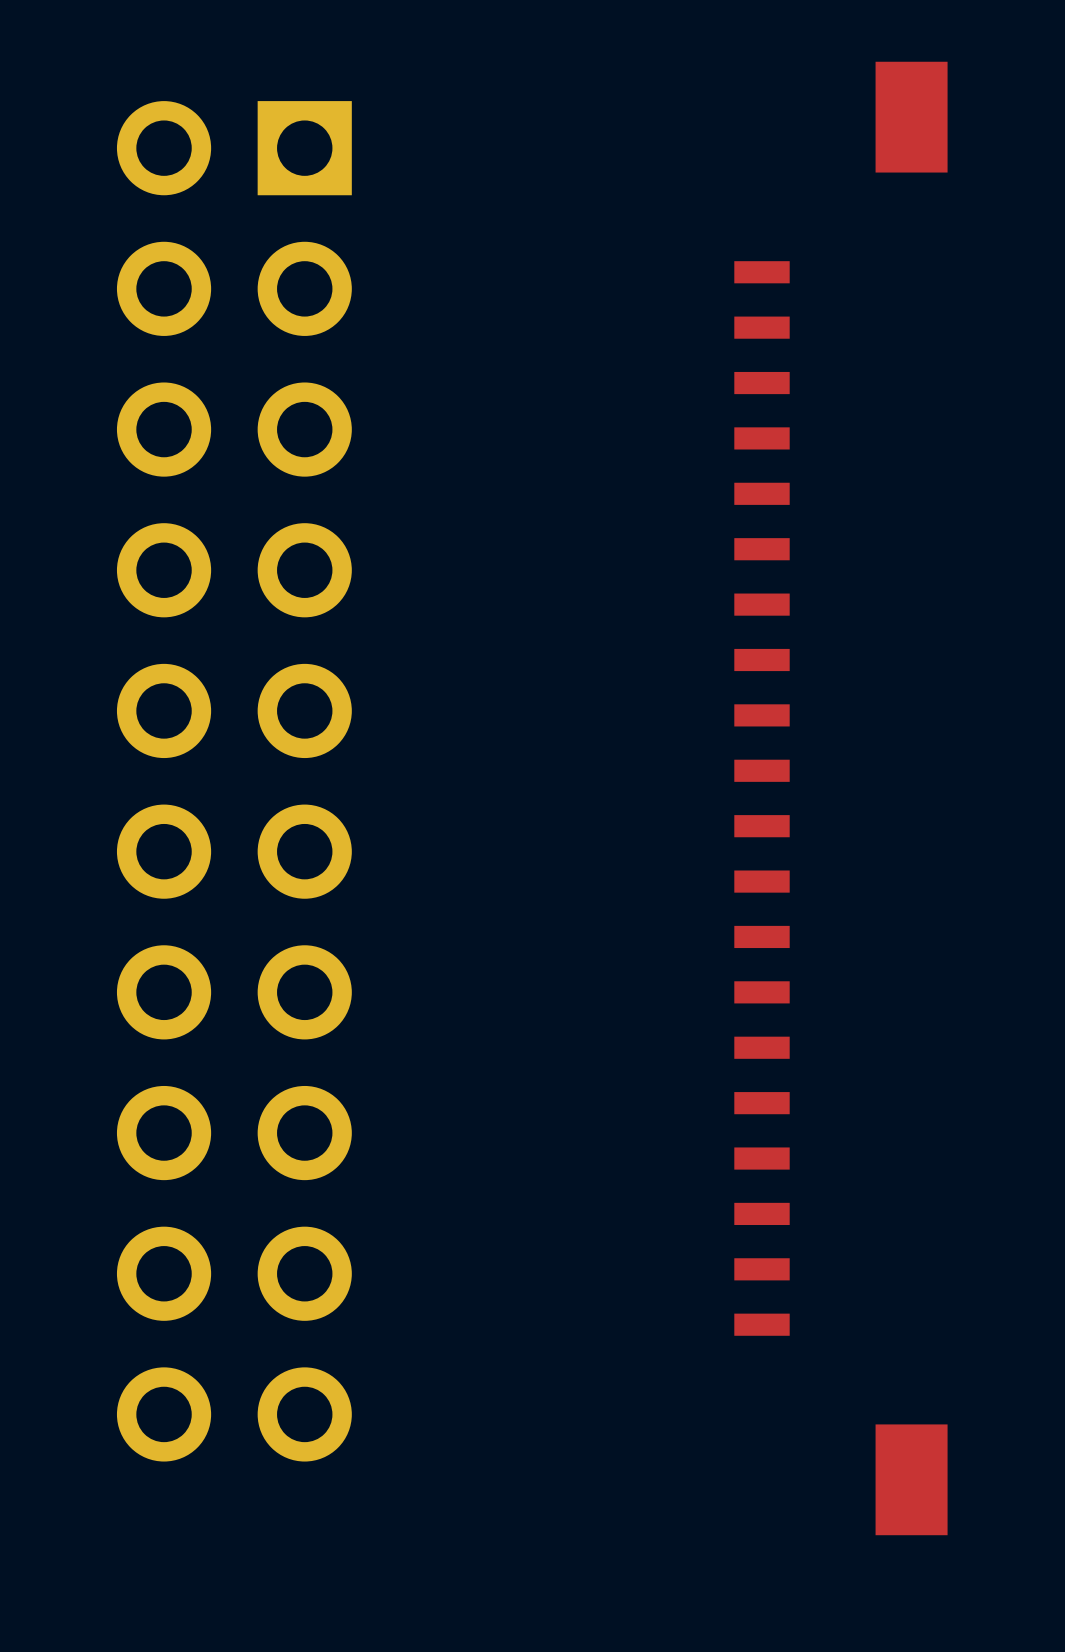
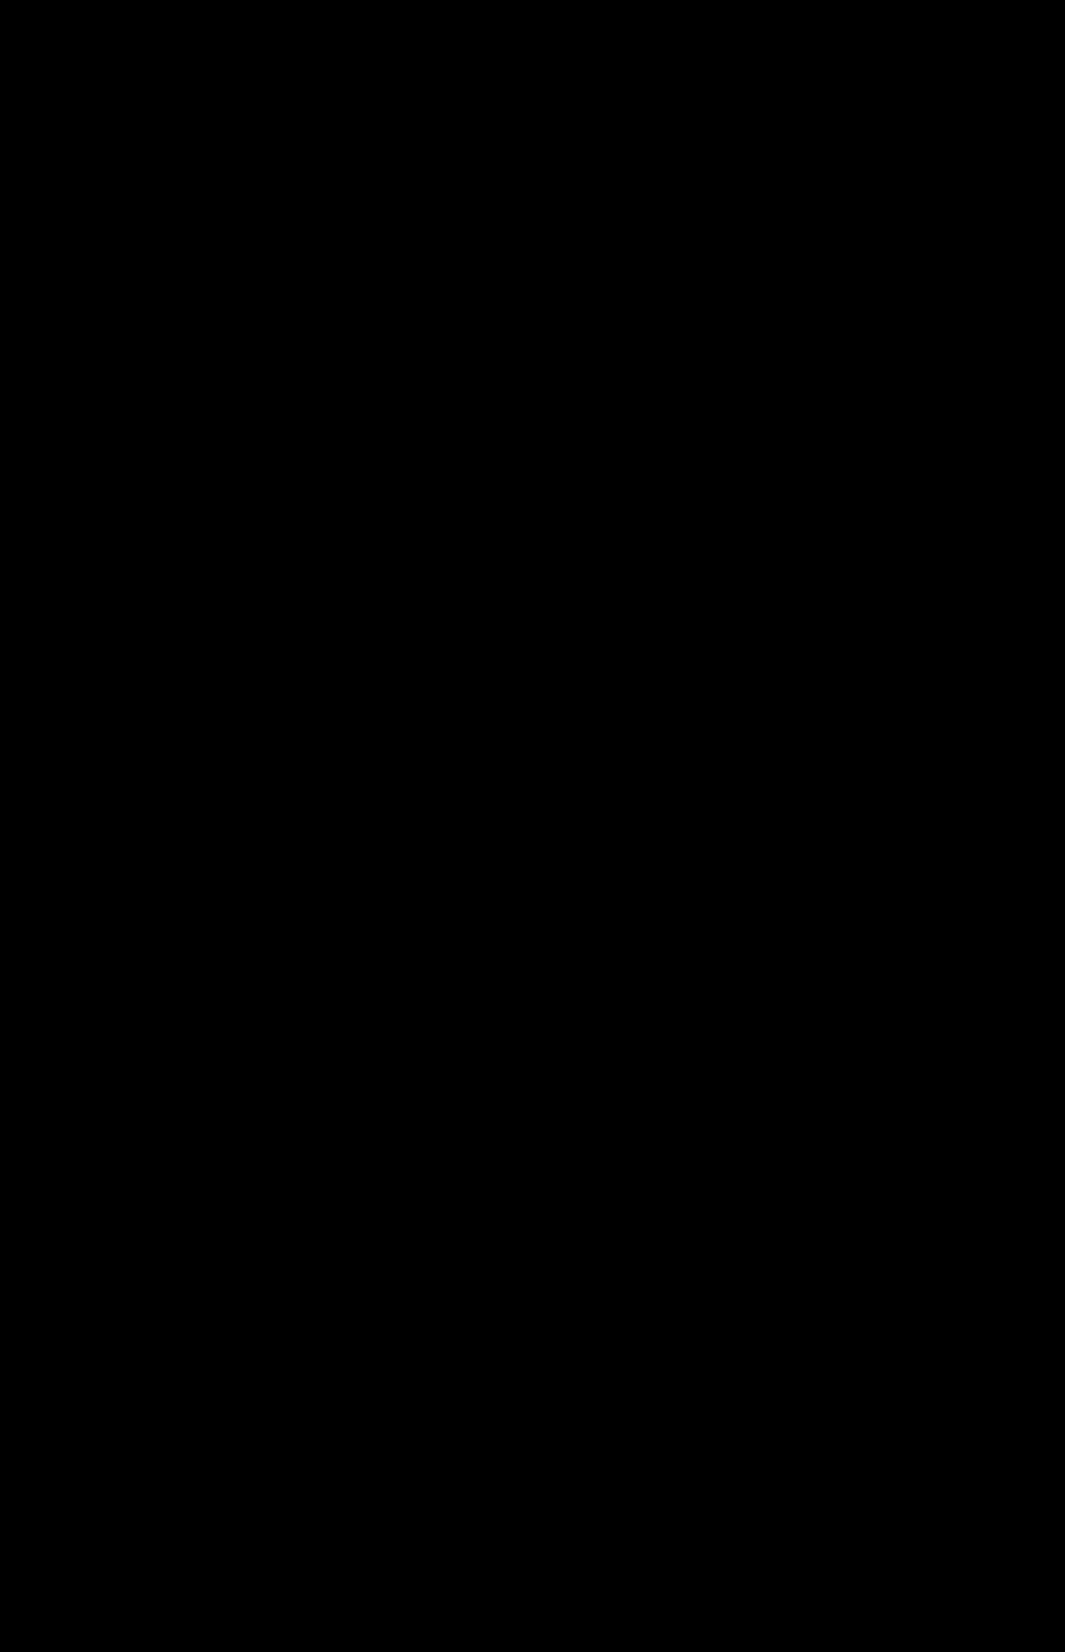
part: (234, 781) -> none
part: (840, 798) -> none

